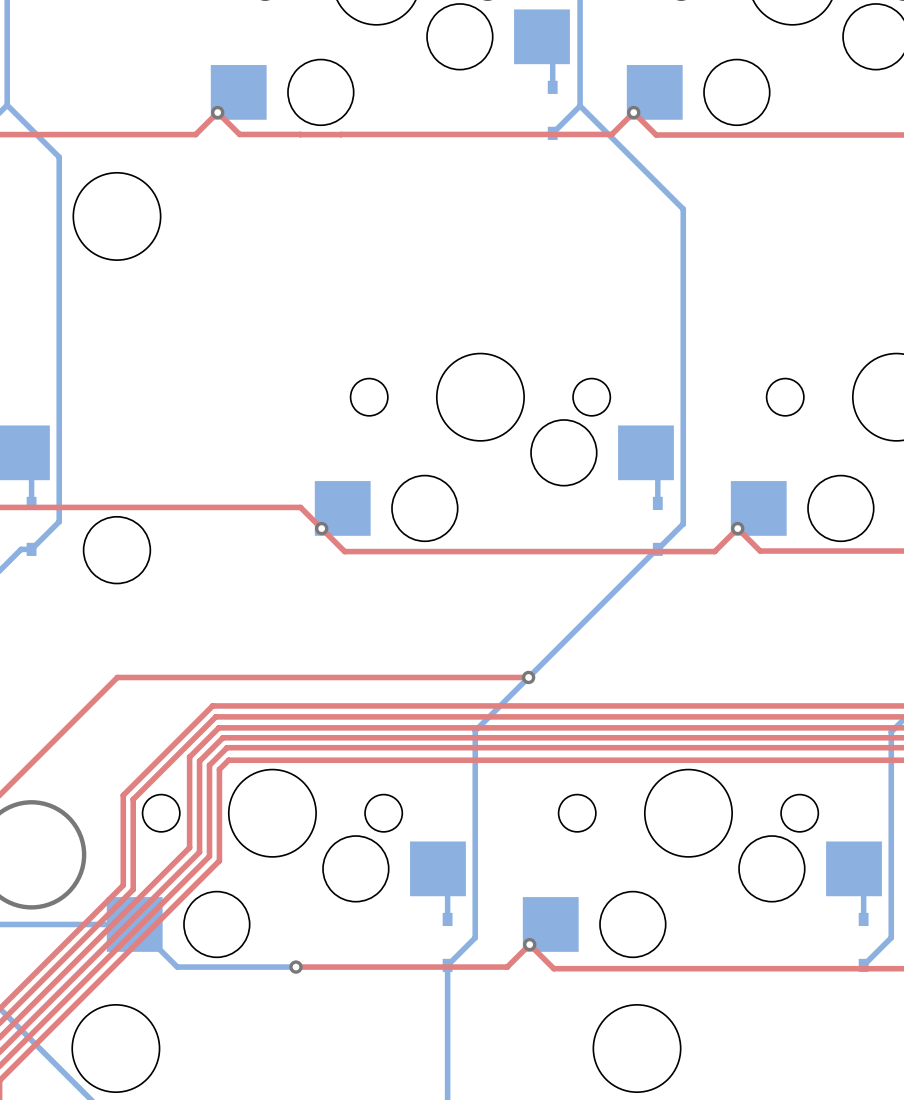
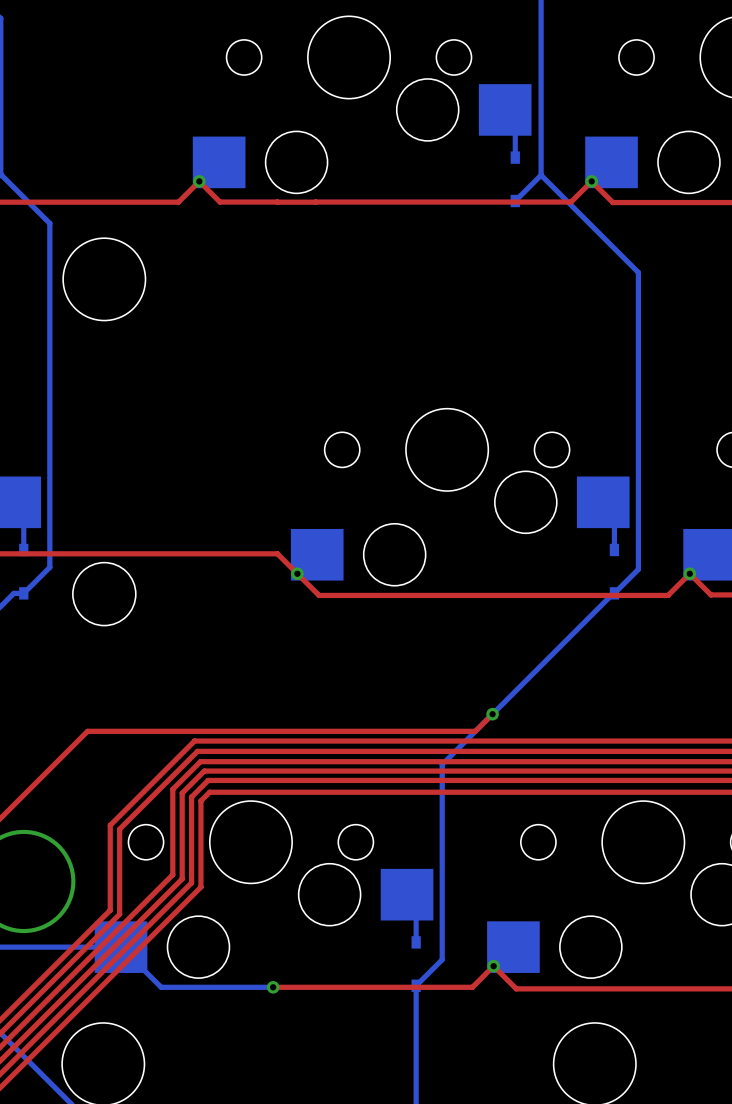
top track: (528, 677) (117, 677) (99, 695) -> (492, 714) (475, 731) (87, 731)

